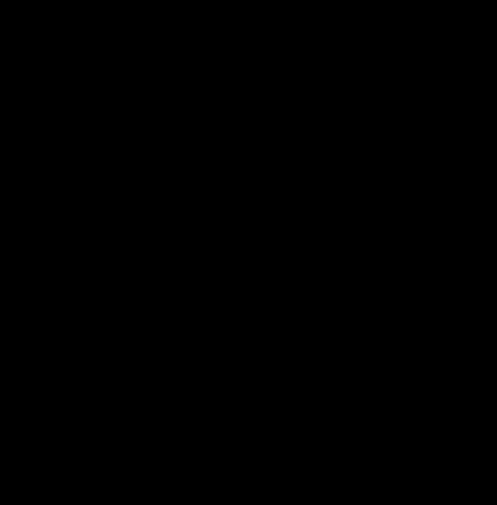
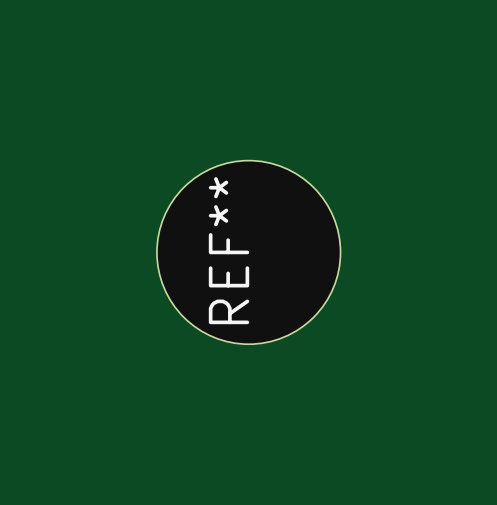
REF**: none -> (248, 252)

